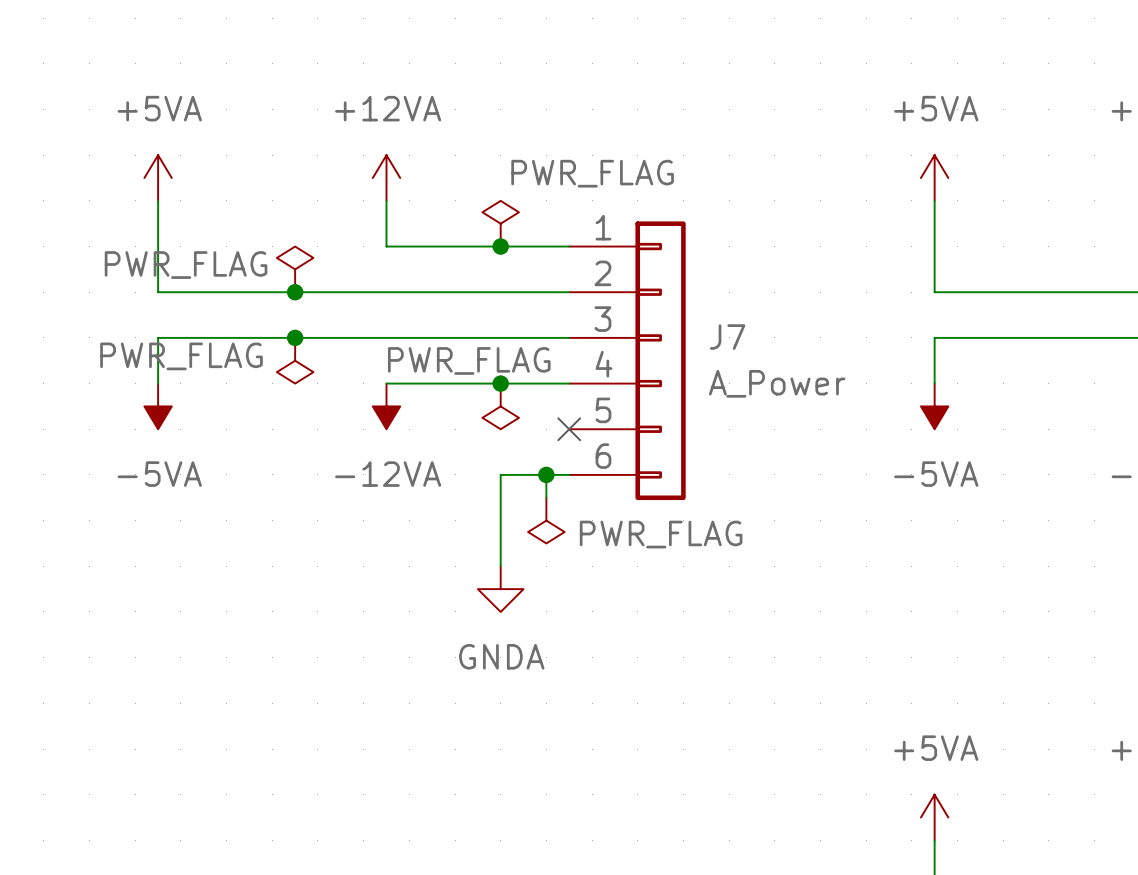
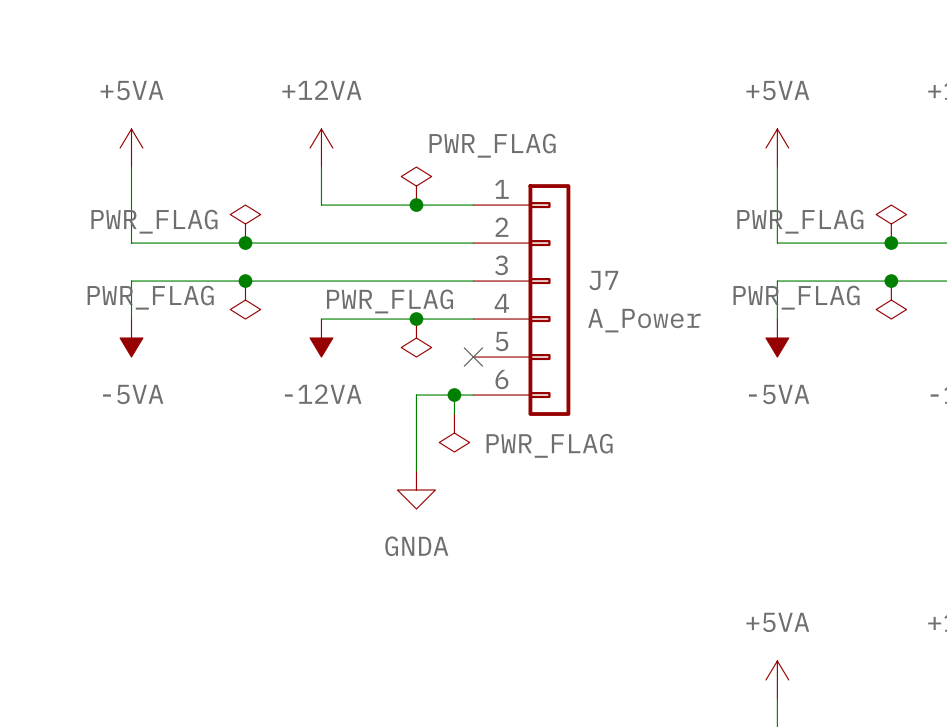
power symbol: none -> PWR_FLAG (891, 224)
junction: none -> (891, 243)
junction: none -> (891, 281)
power symbol: none -> PWR_FLAG (891, 300)

